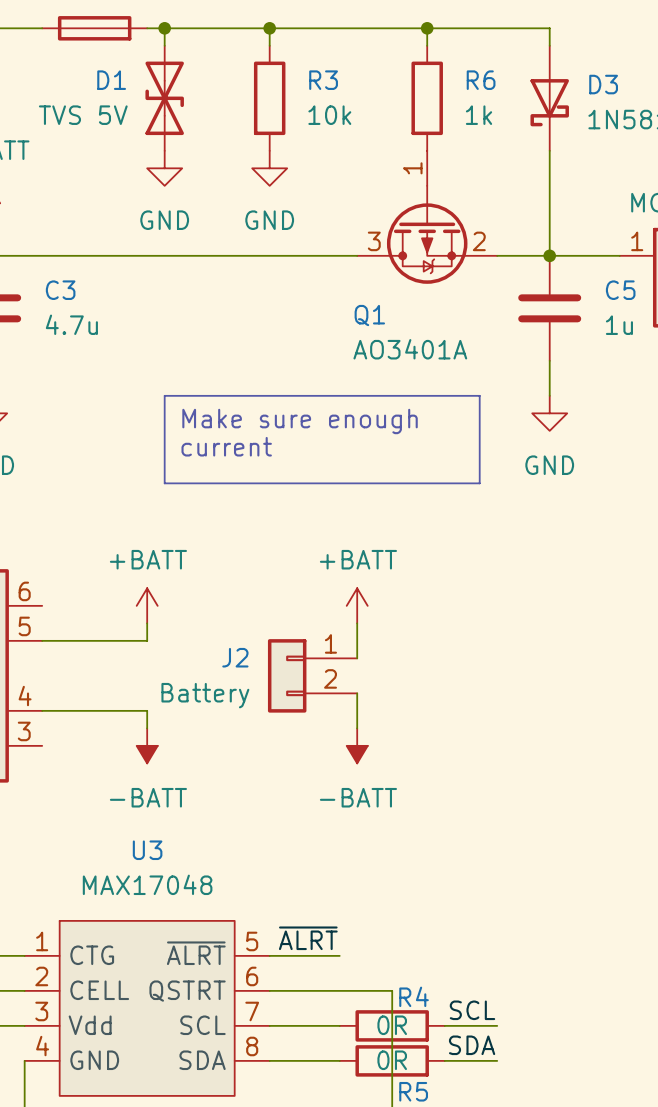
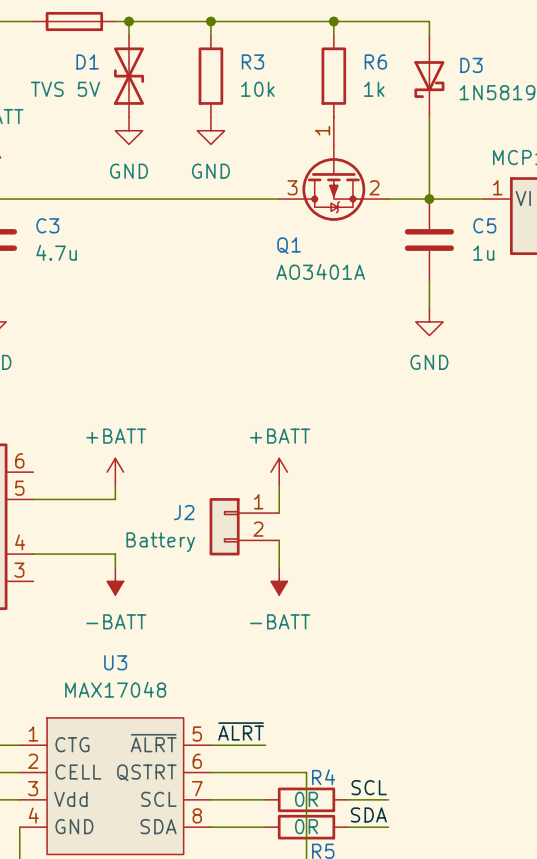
line: (164, 395) (479, 395) (479, 483) (164, 483) (164, 395) -> none
text: Make sure enough (300, 421) -> none
text: current (226, 446) -> none

